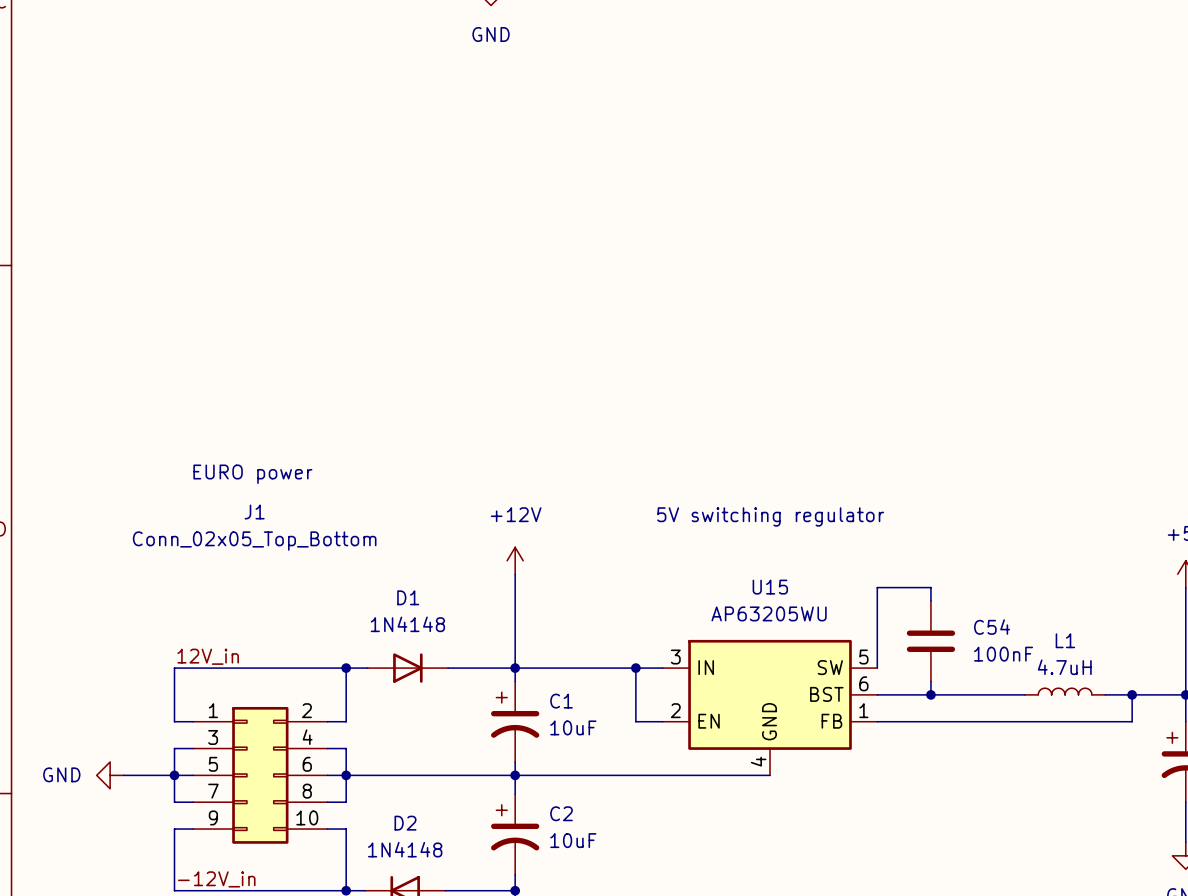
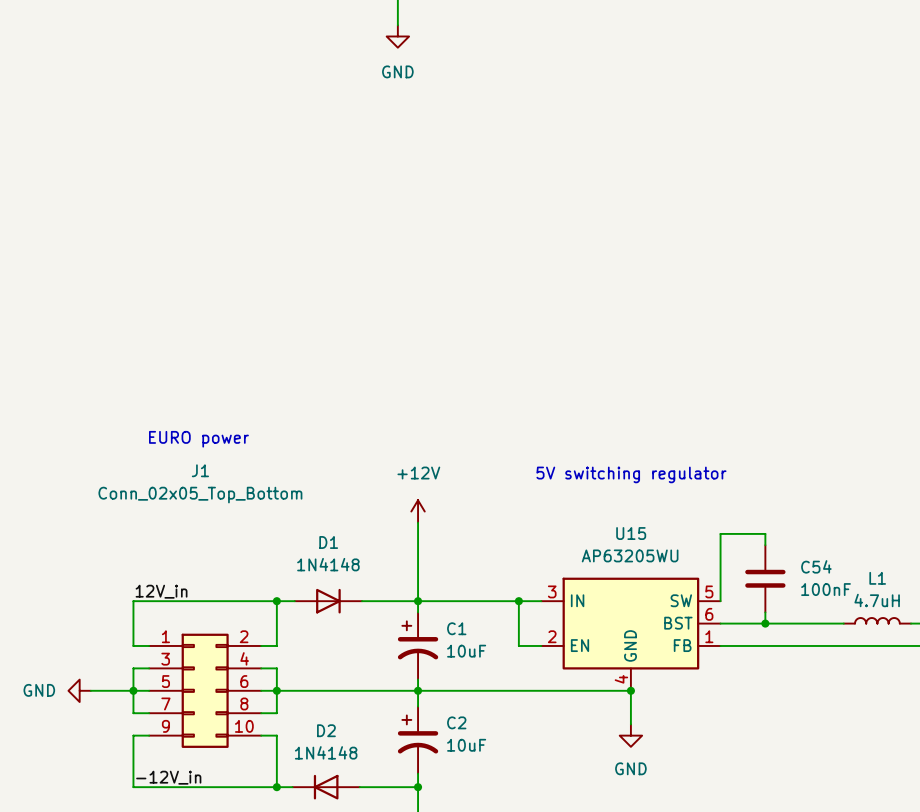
wire: none -> (630, 690) (630, 724)
junction: none -> (630, 690)
power symbol: none -> GND (630, 735)

